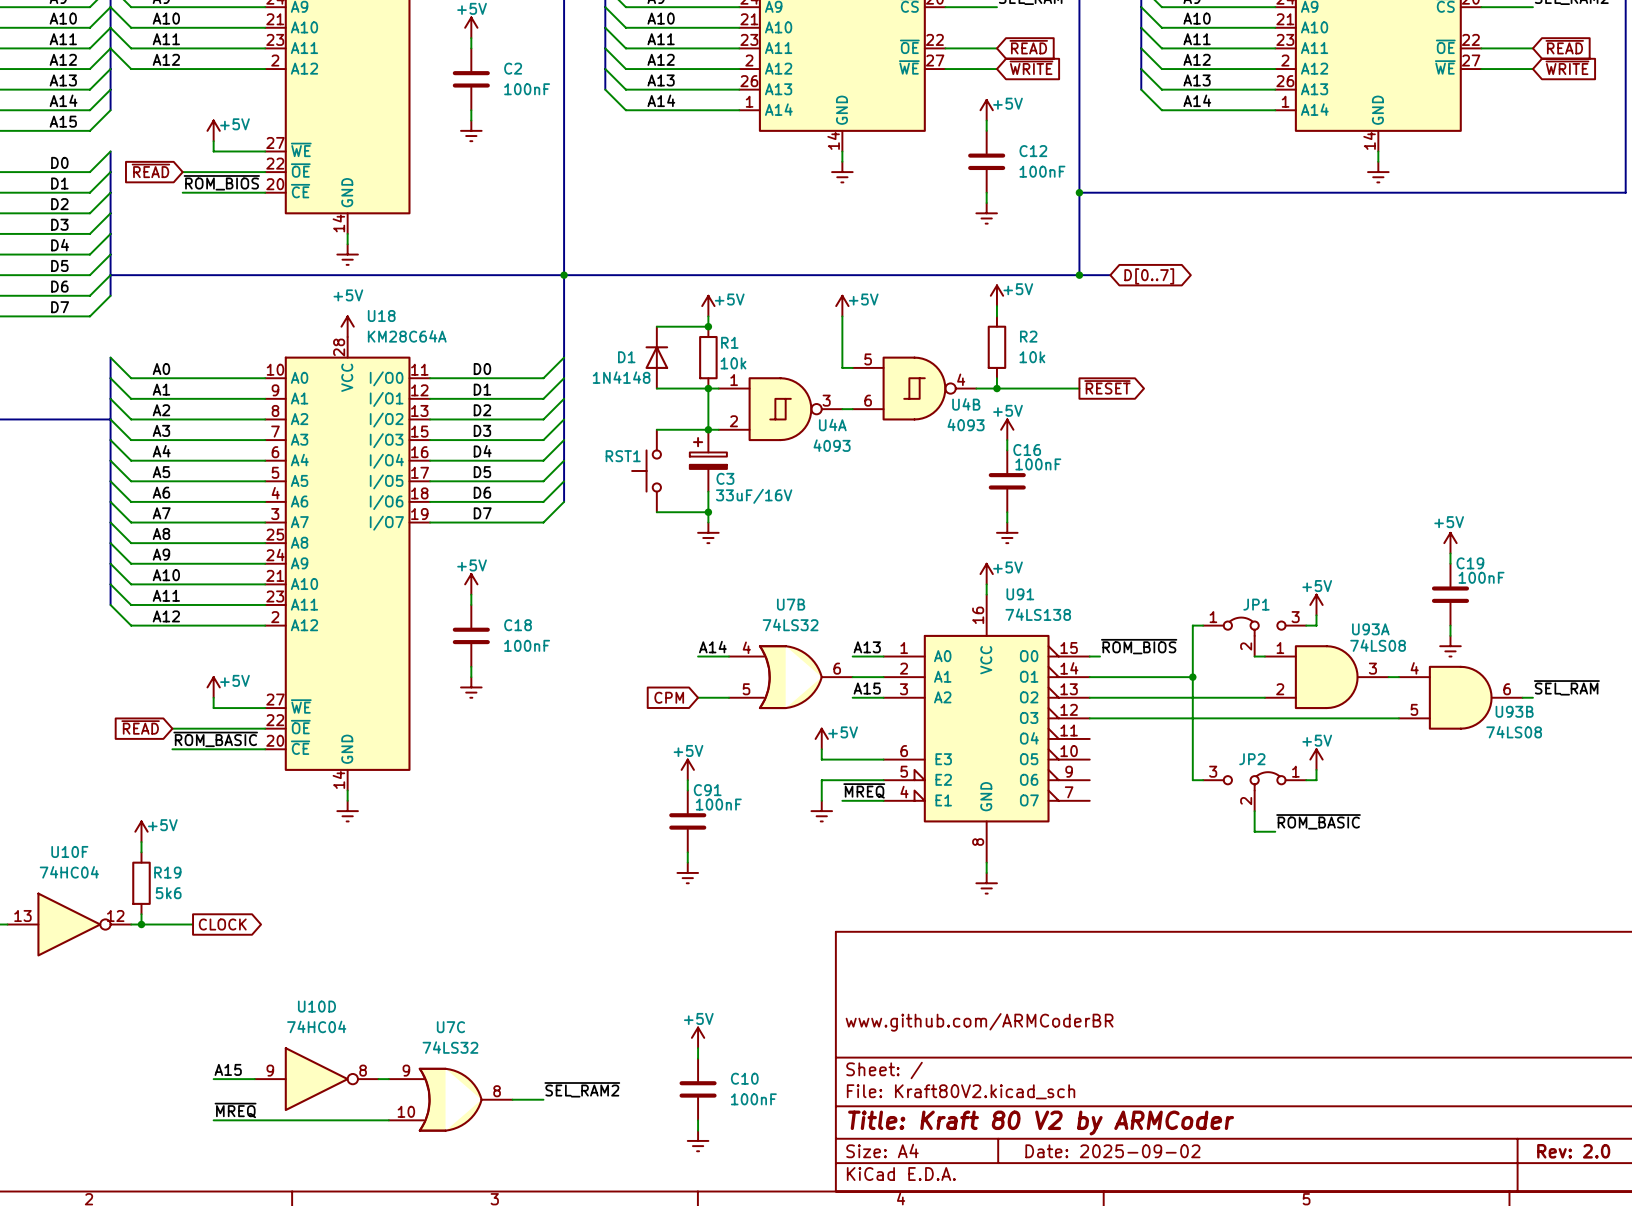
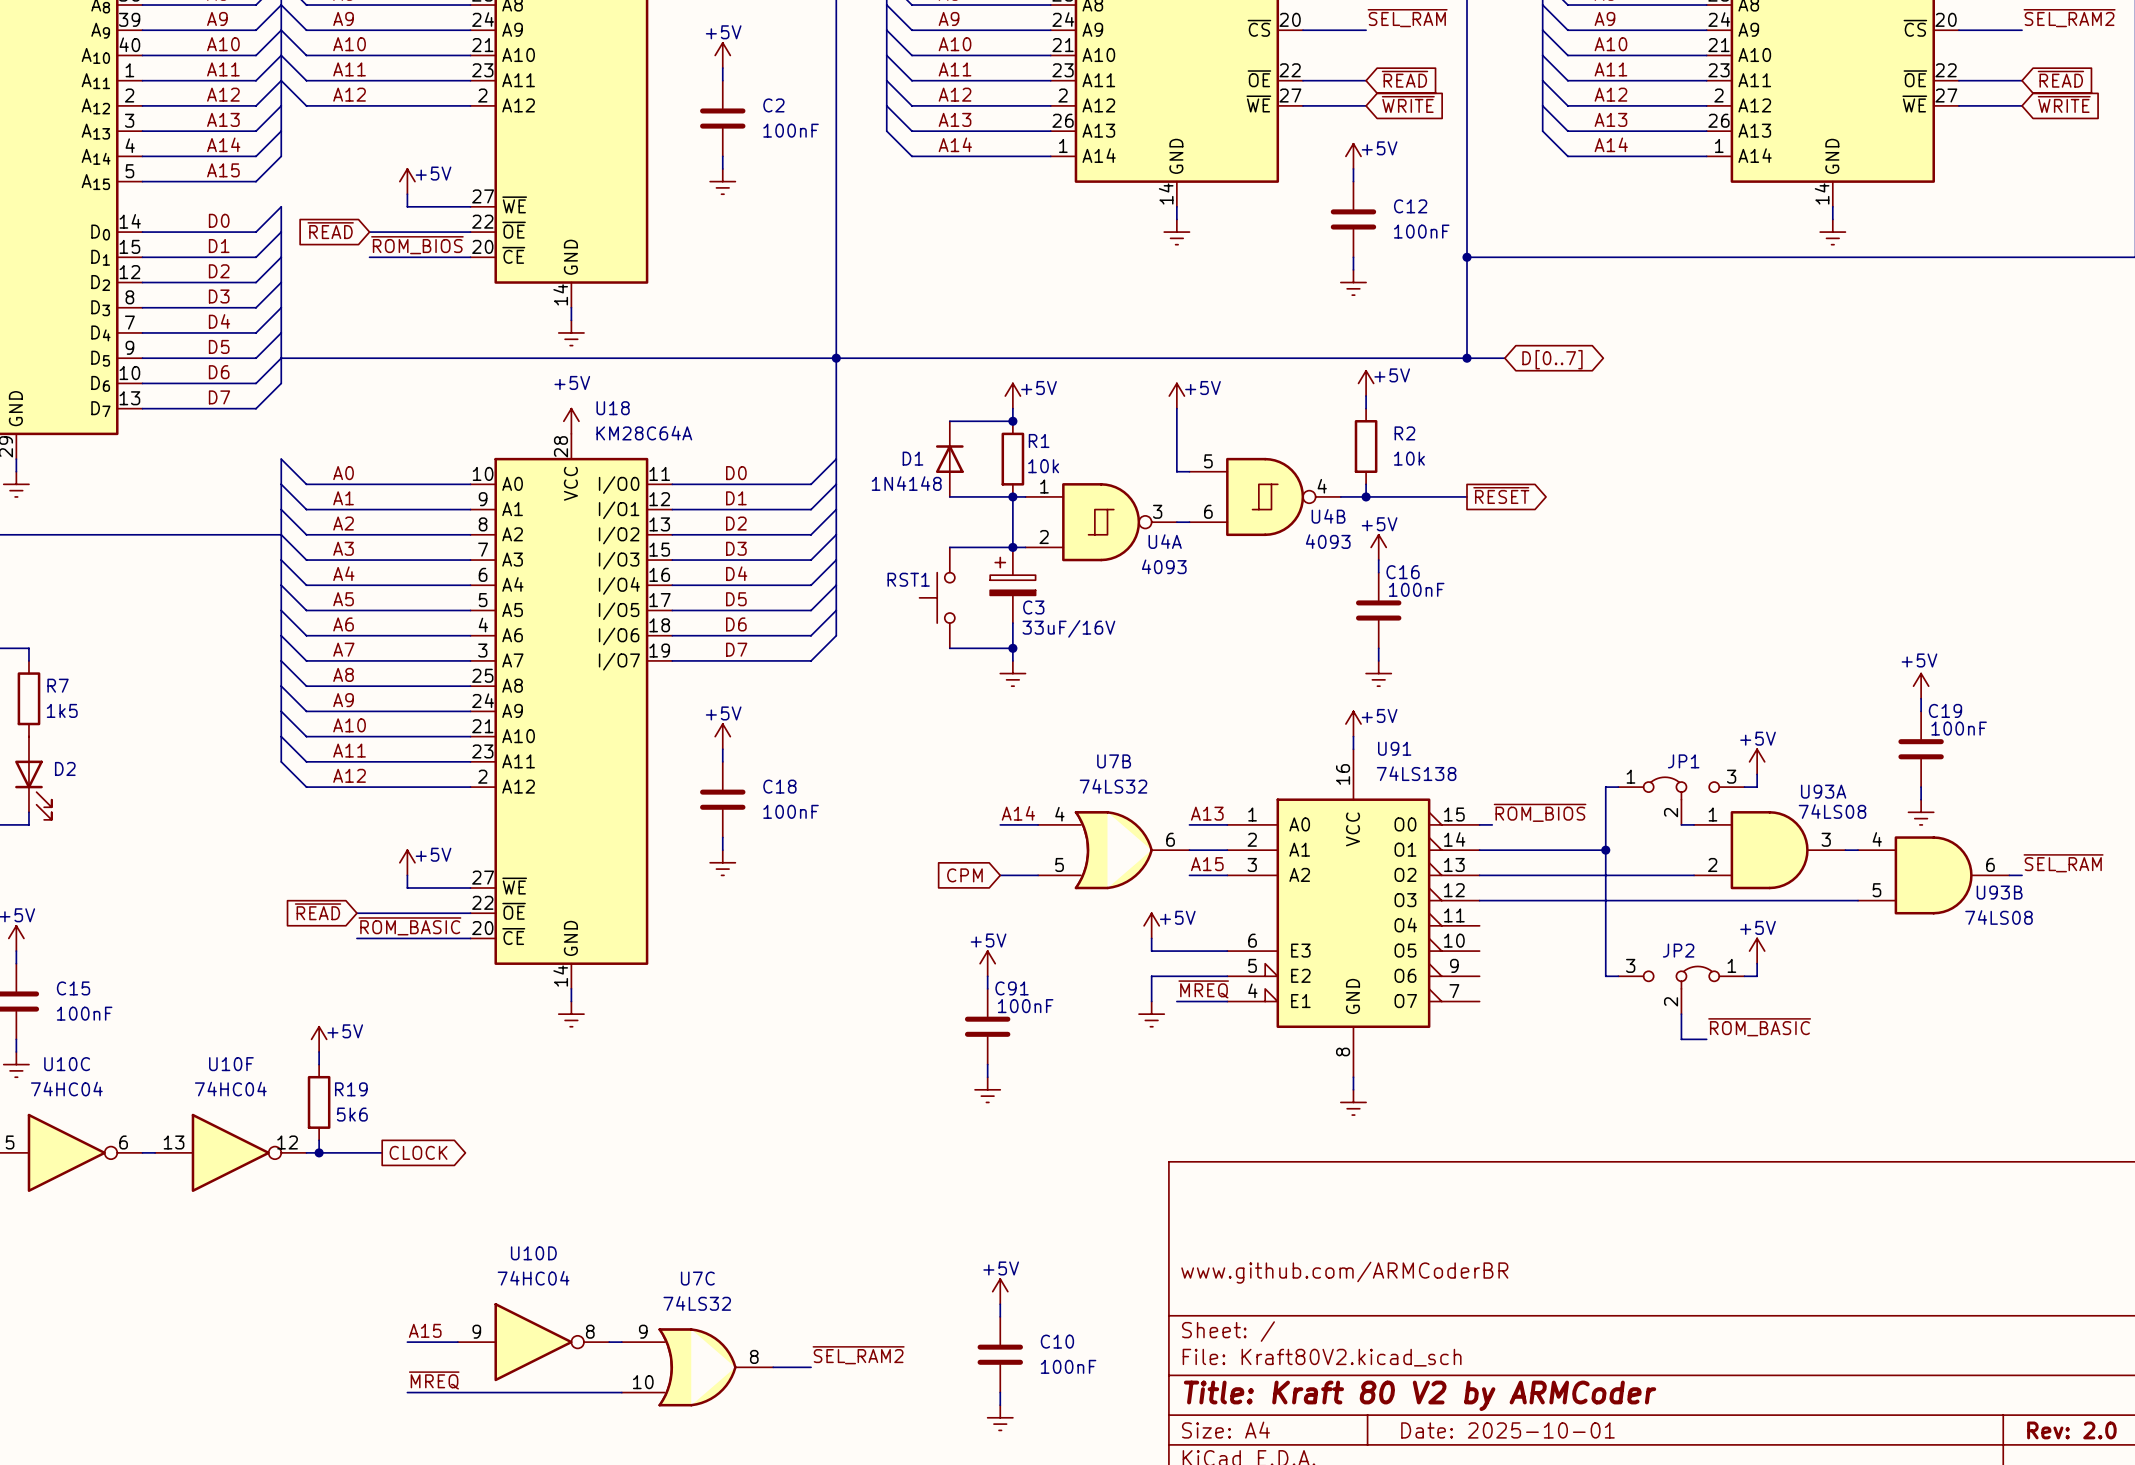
title block: Date: 2025-09-02 (1112, 1151) -> Date: 2025-10-01 (1507, 1430)

